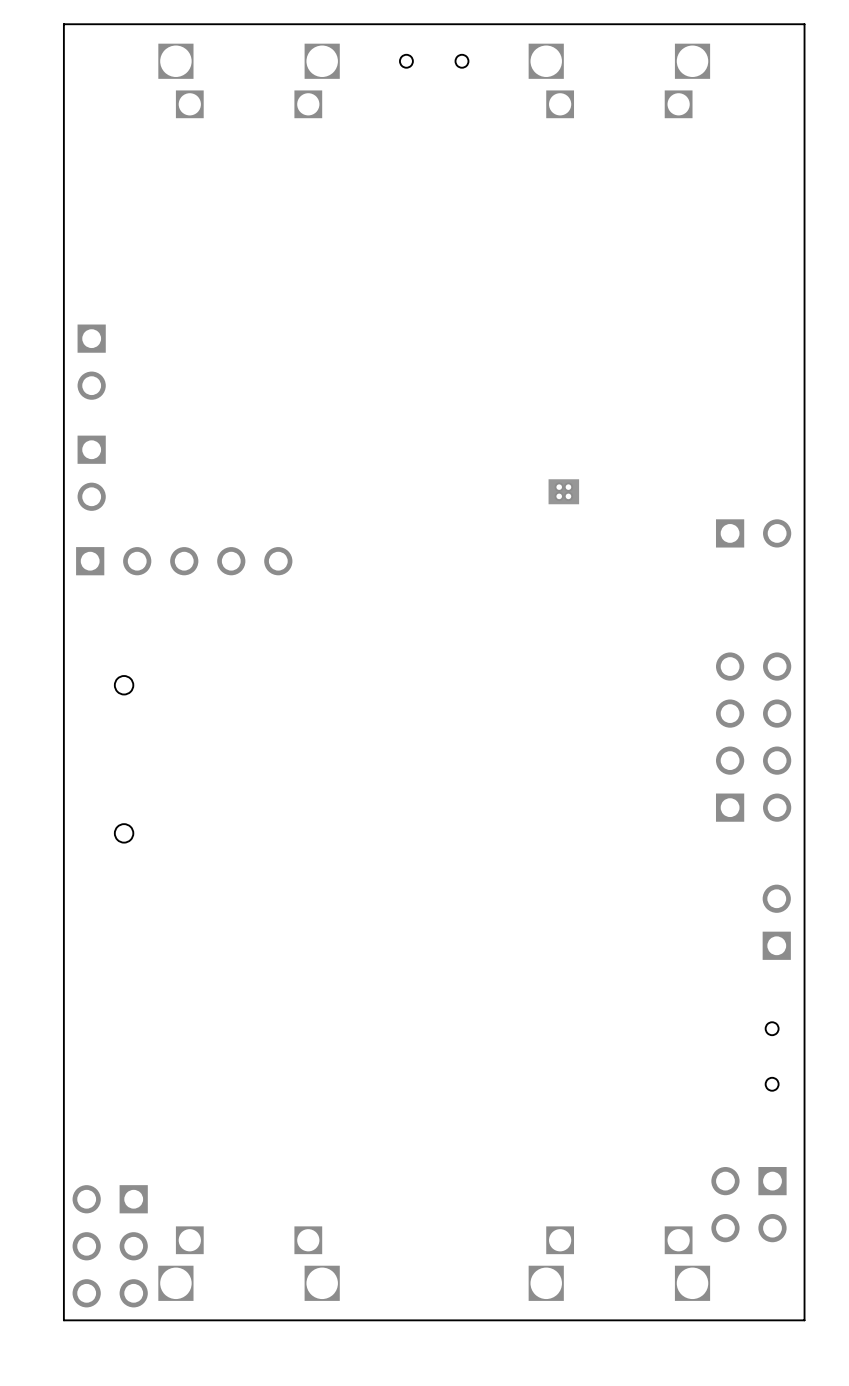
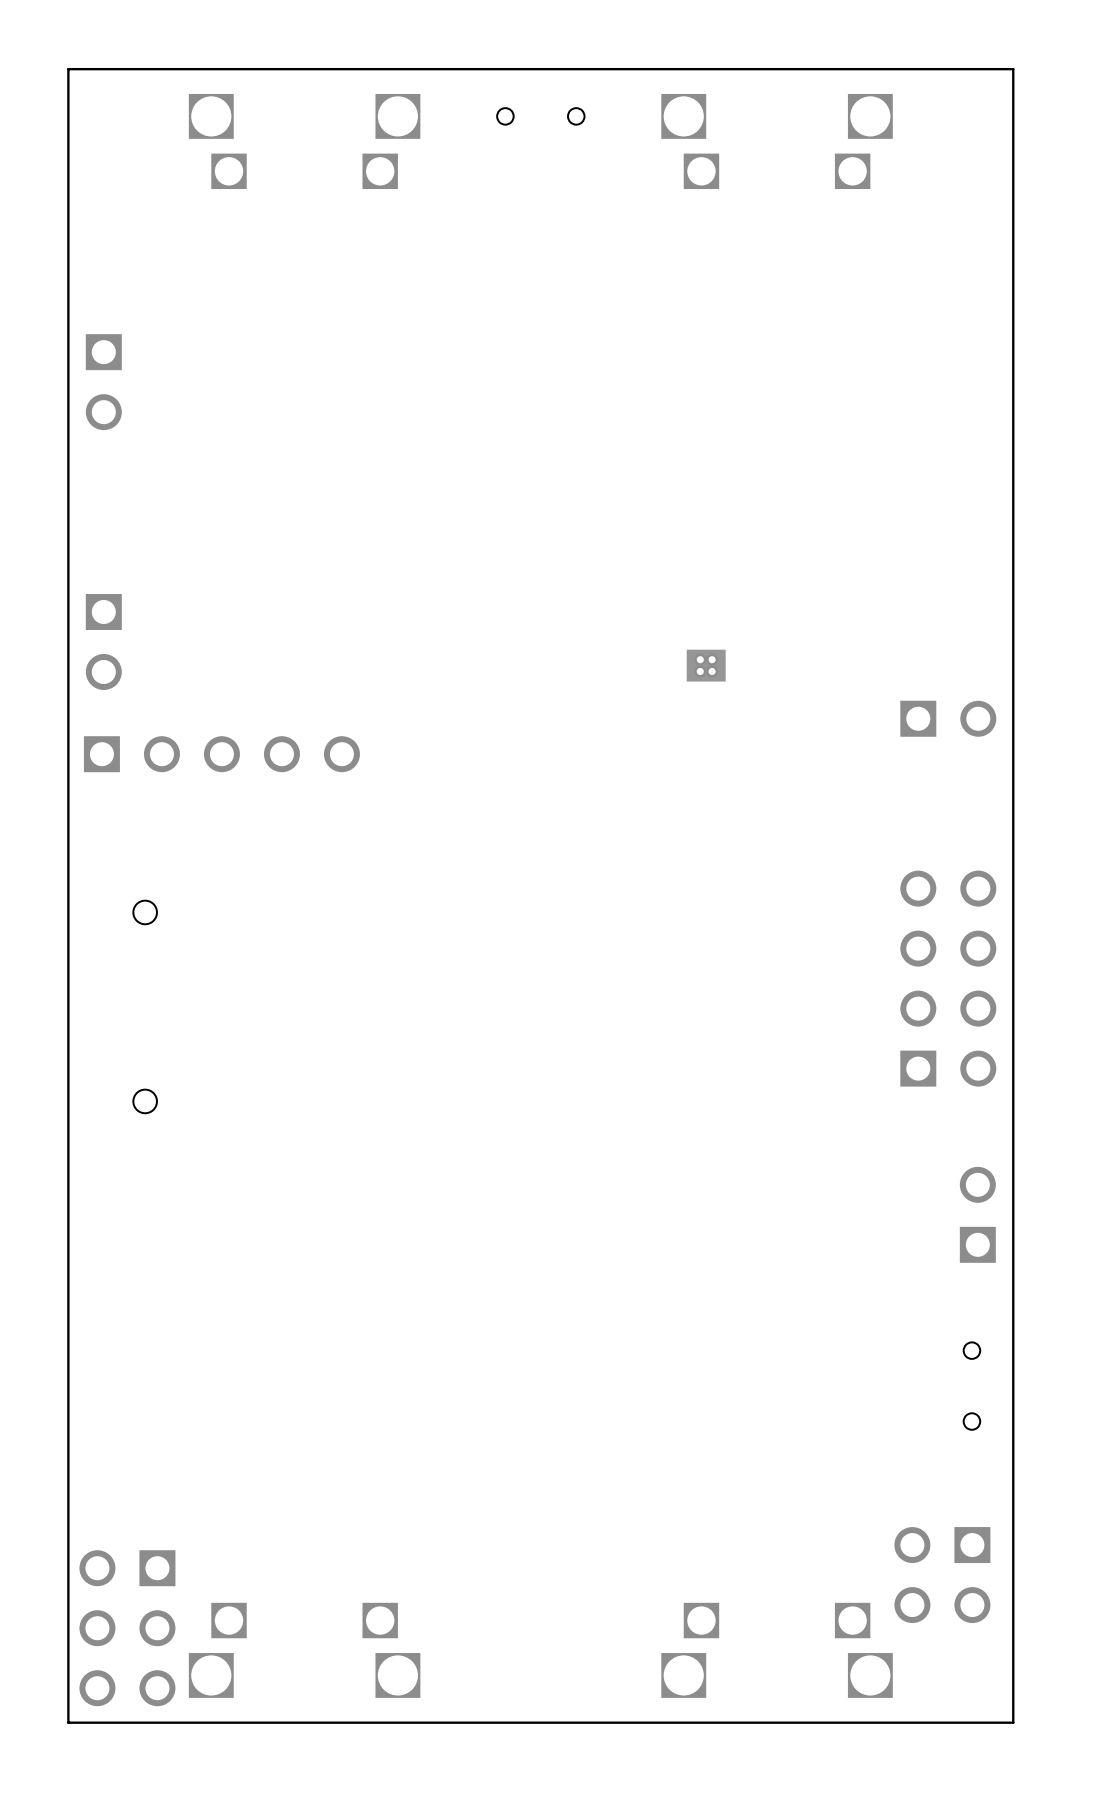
part position: (91, 362) -> (103, 382)

